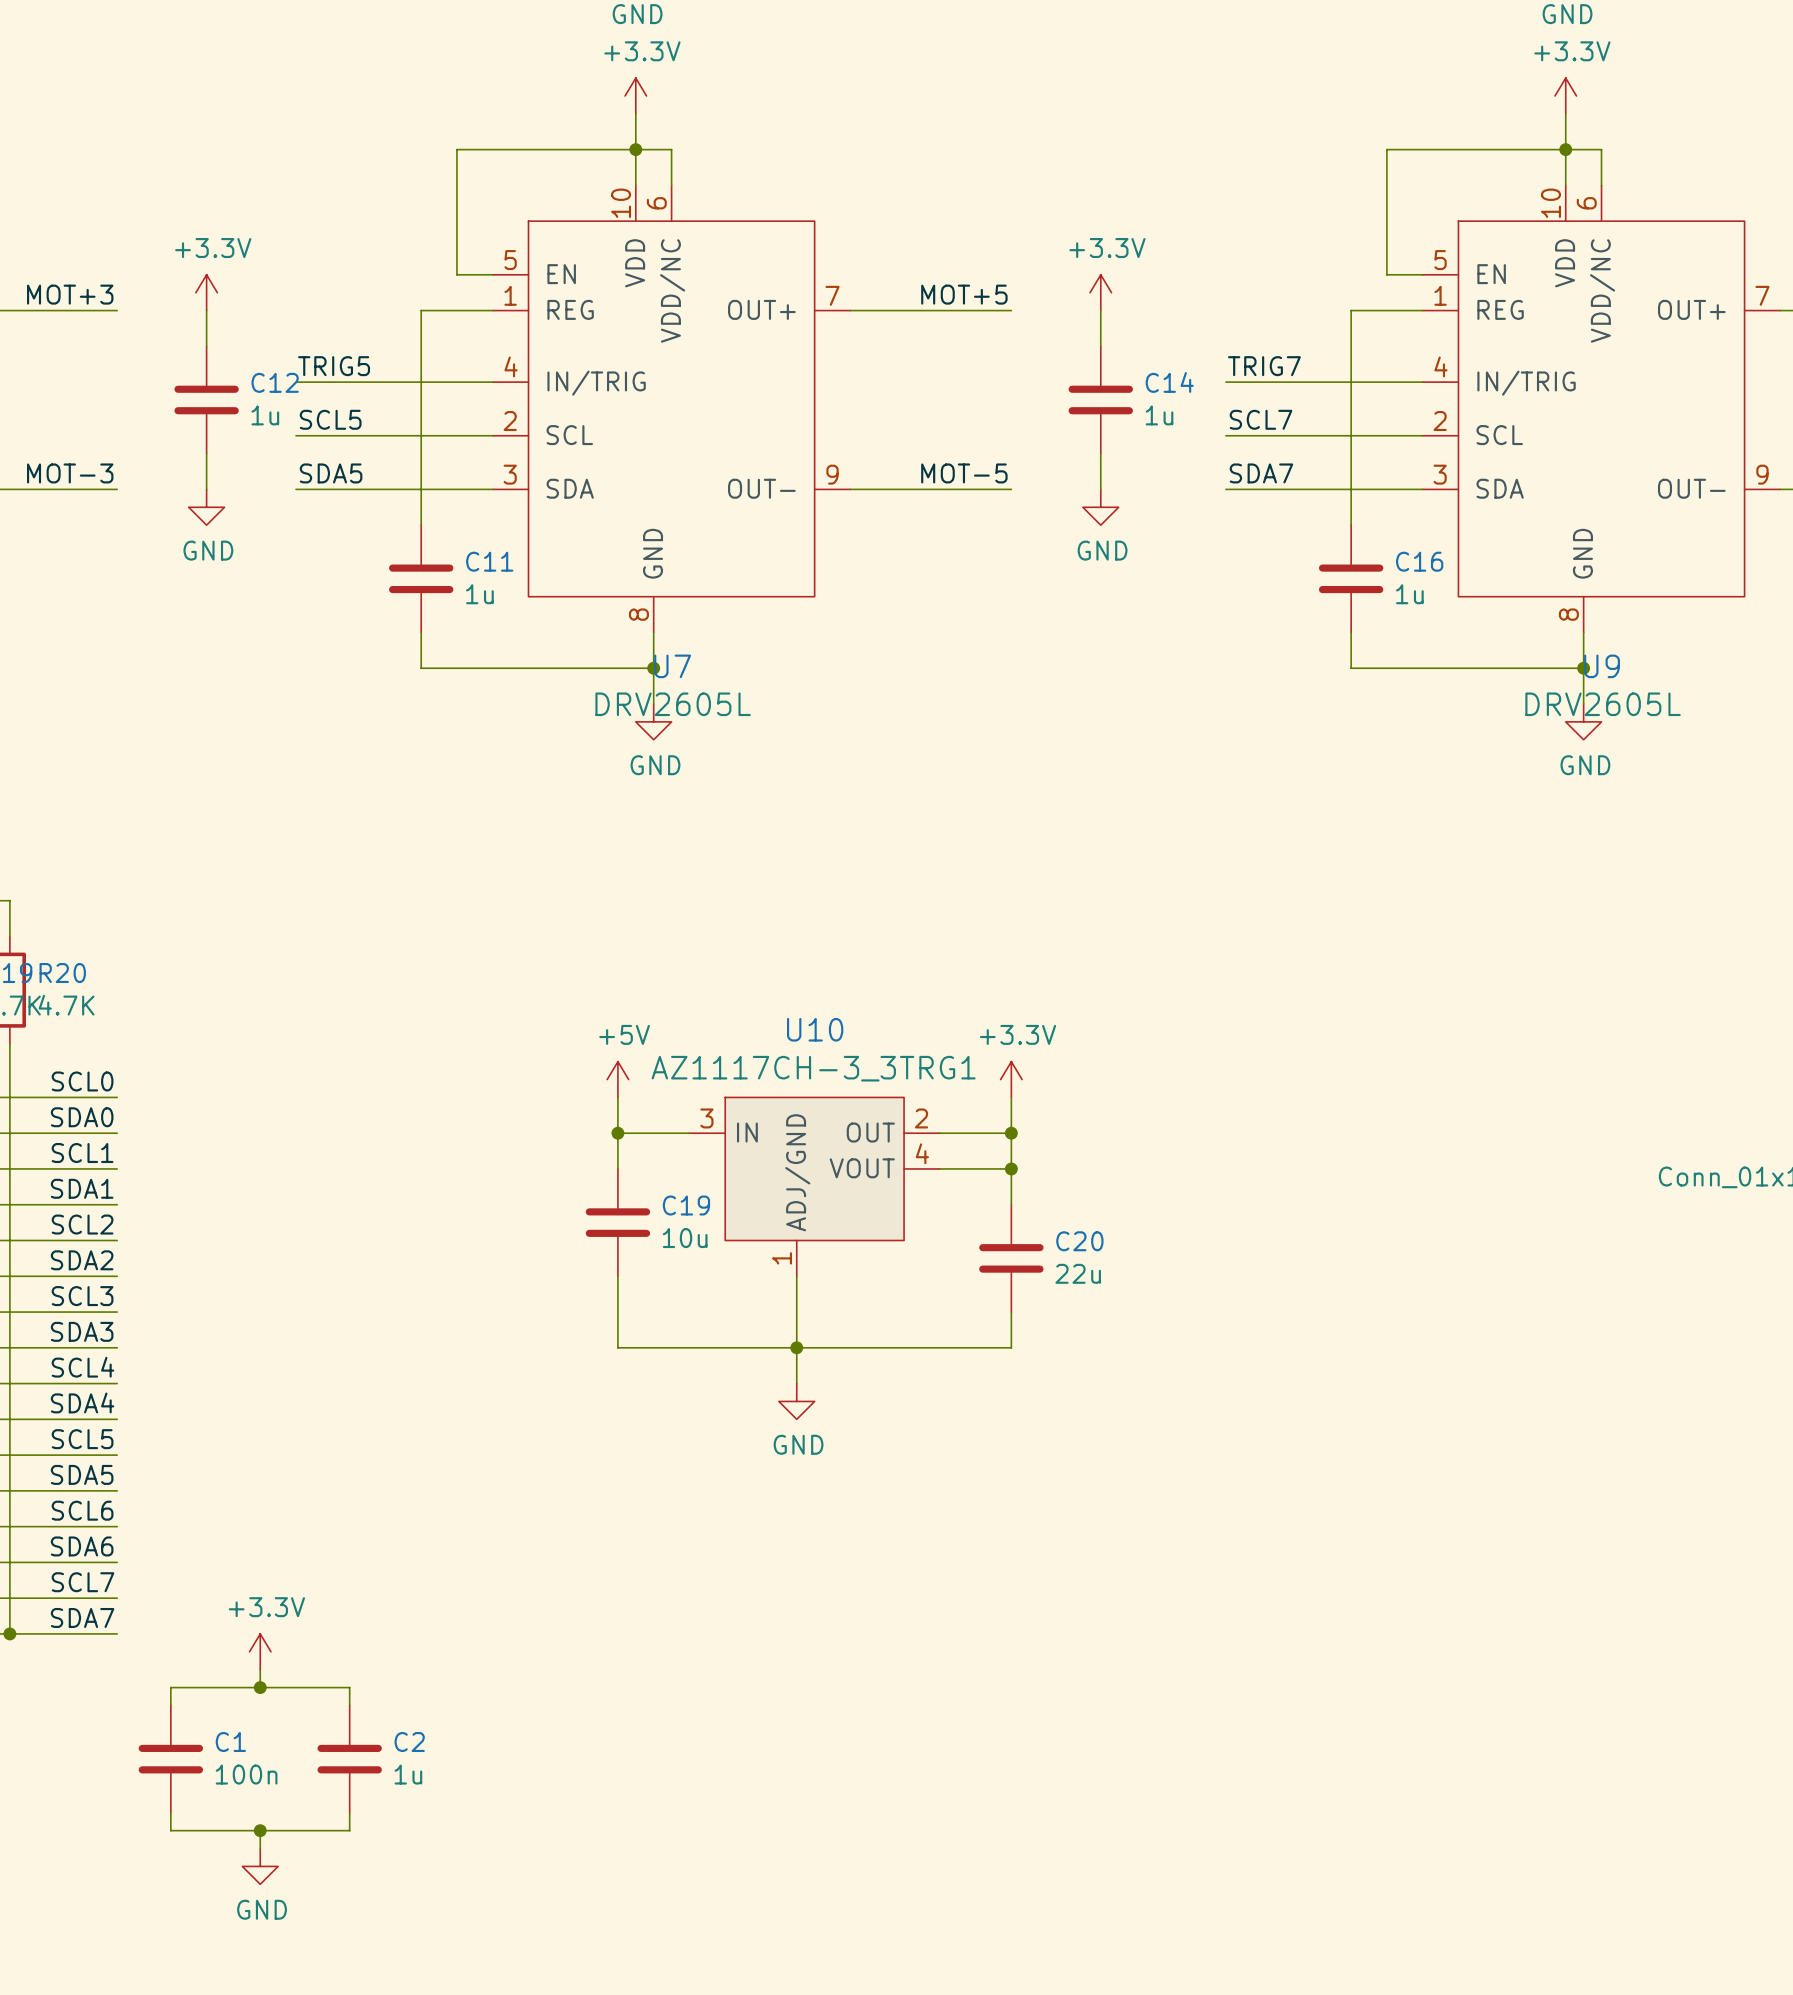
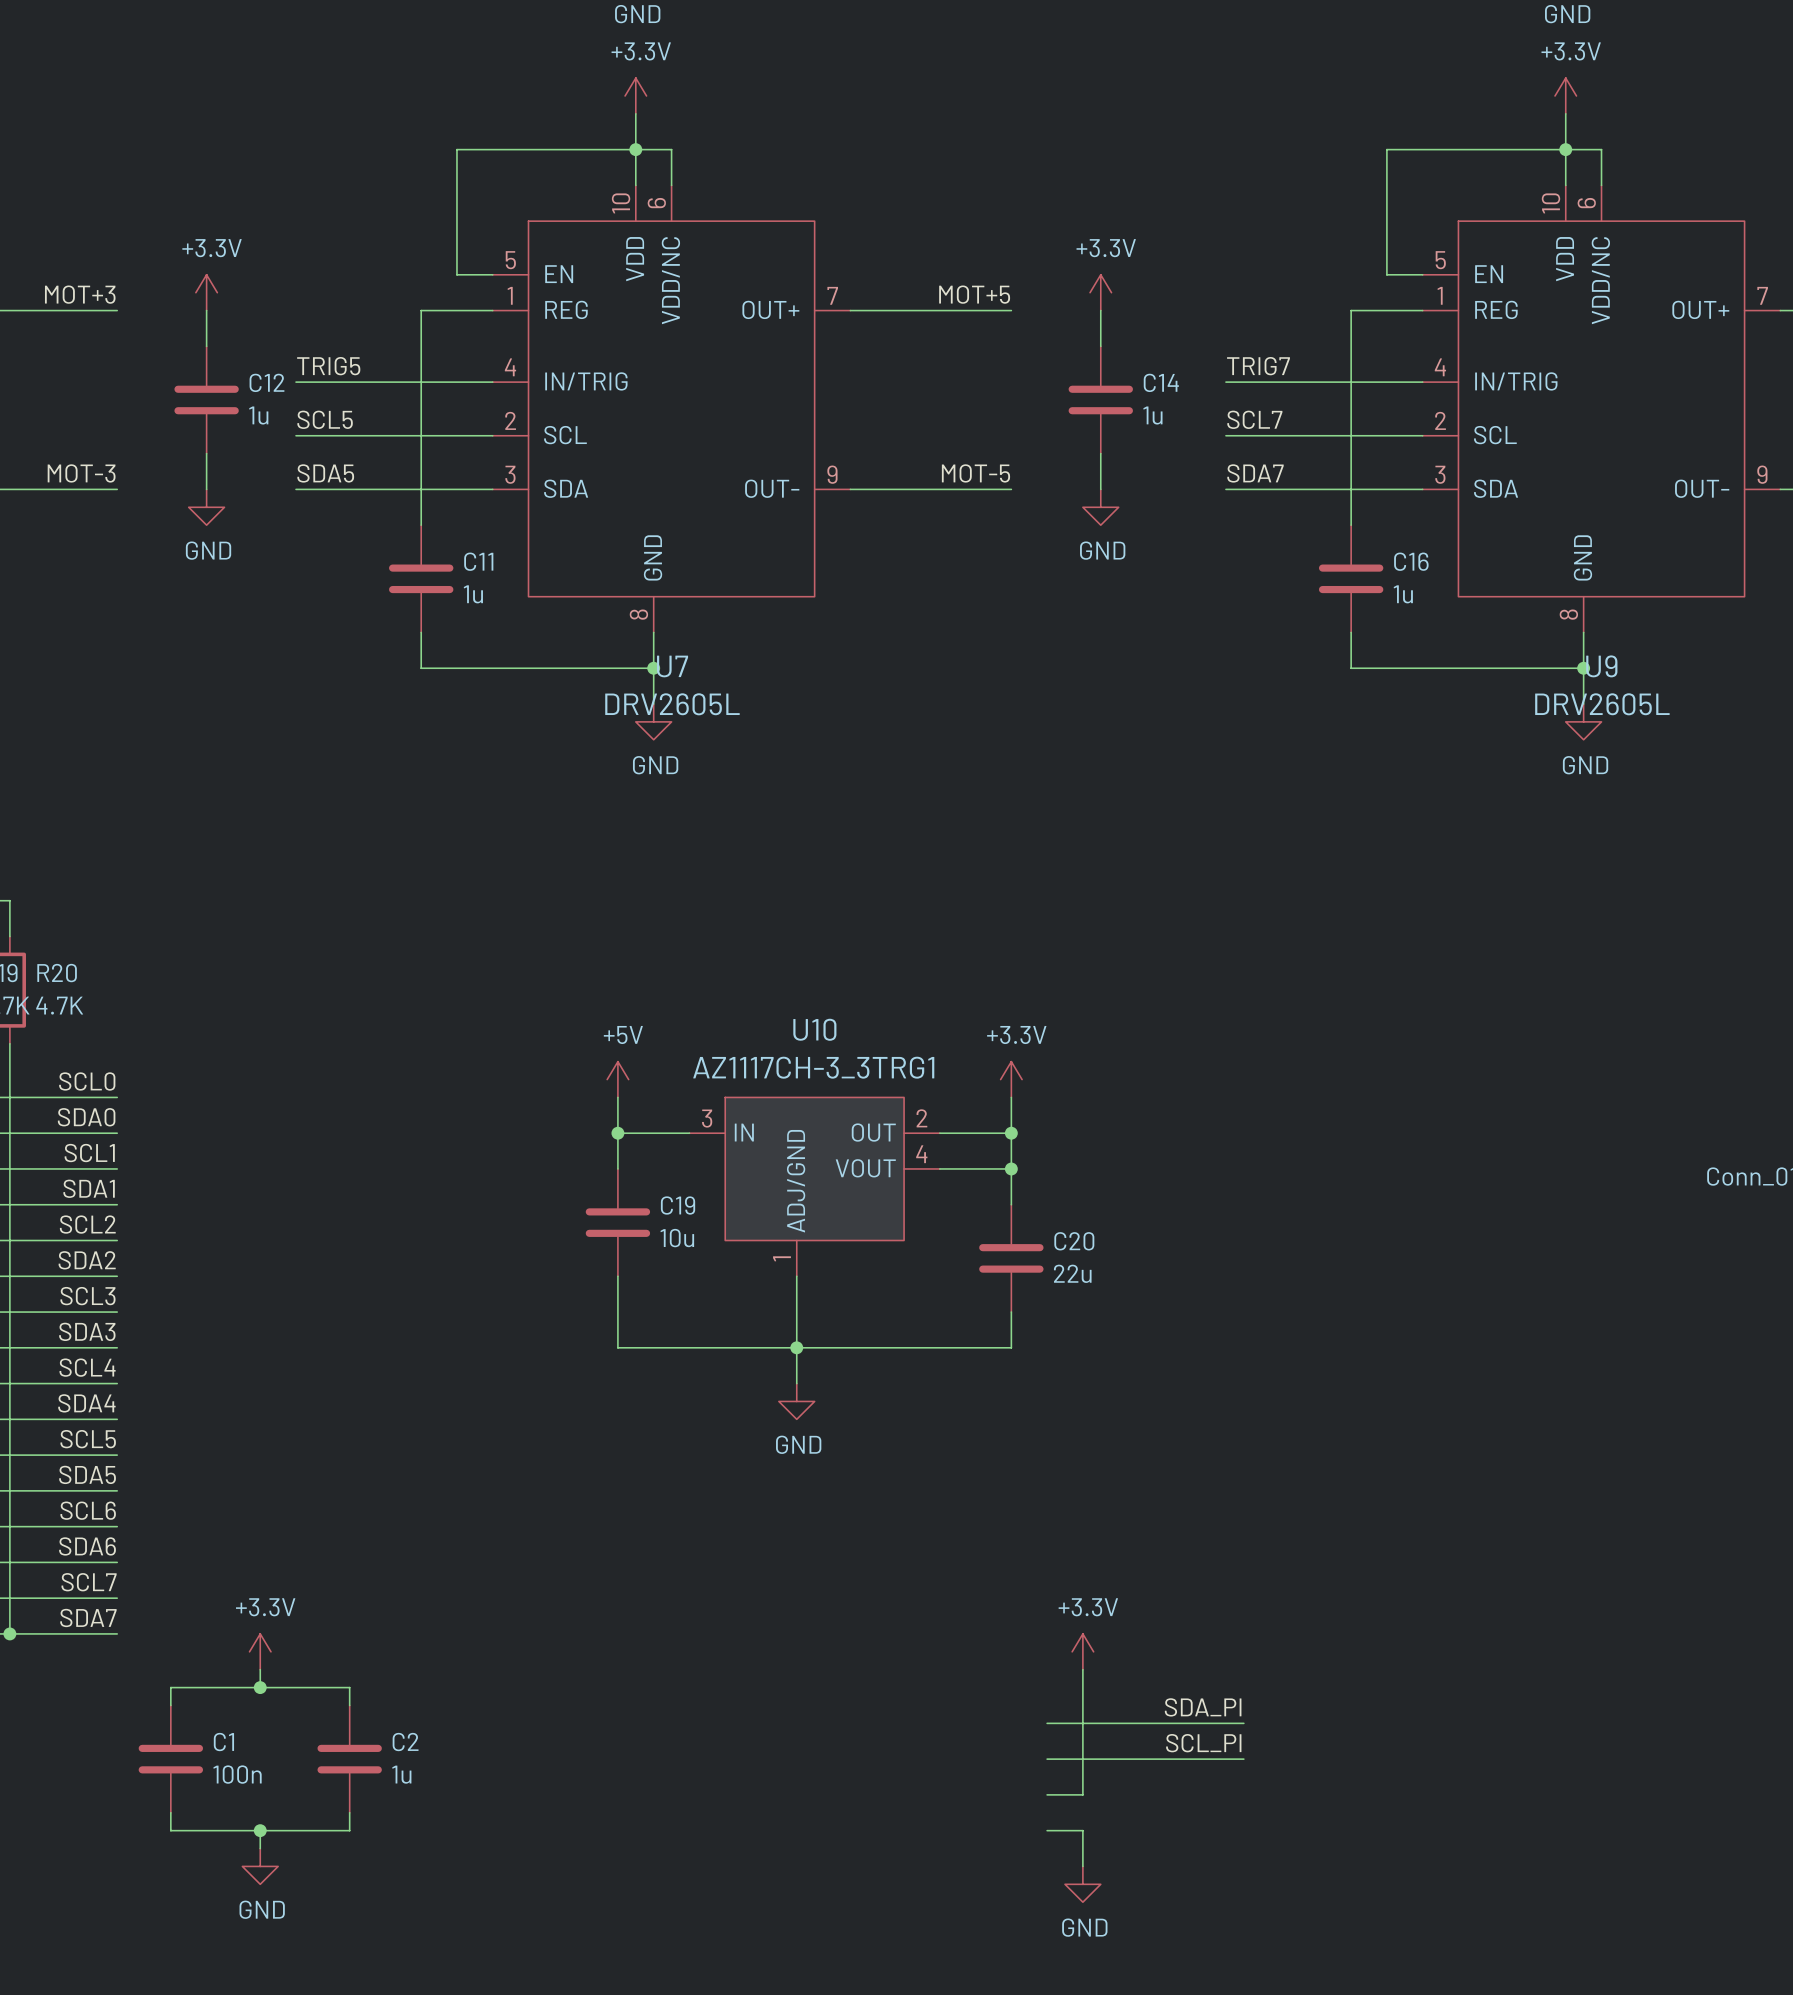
power symbol: none -> +3.3V (1082, 1651)
wire: none -> (1082, 1669) (1082, 1794) (1047, 1794)
label: none -> SDA_PI (1203, 1707)
wire: none -> (1047, 1723) (1243, 1723)
label: none -> SCL_PI (1203, 1743)
wire: none -> (1047, 1759) (1243, 1759)
wire: none -> (1047, 1830) (1082, 1830) (1082, 1866)
power symbol: none -> GND (1082, 1884)

